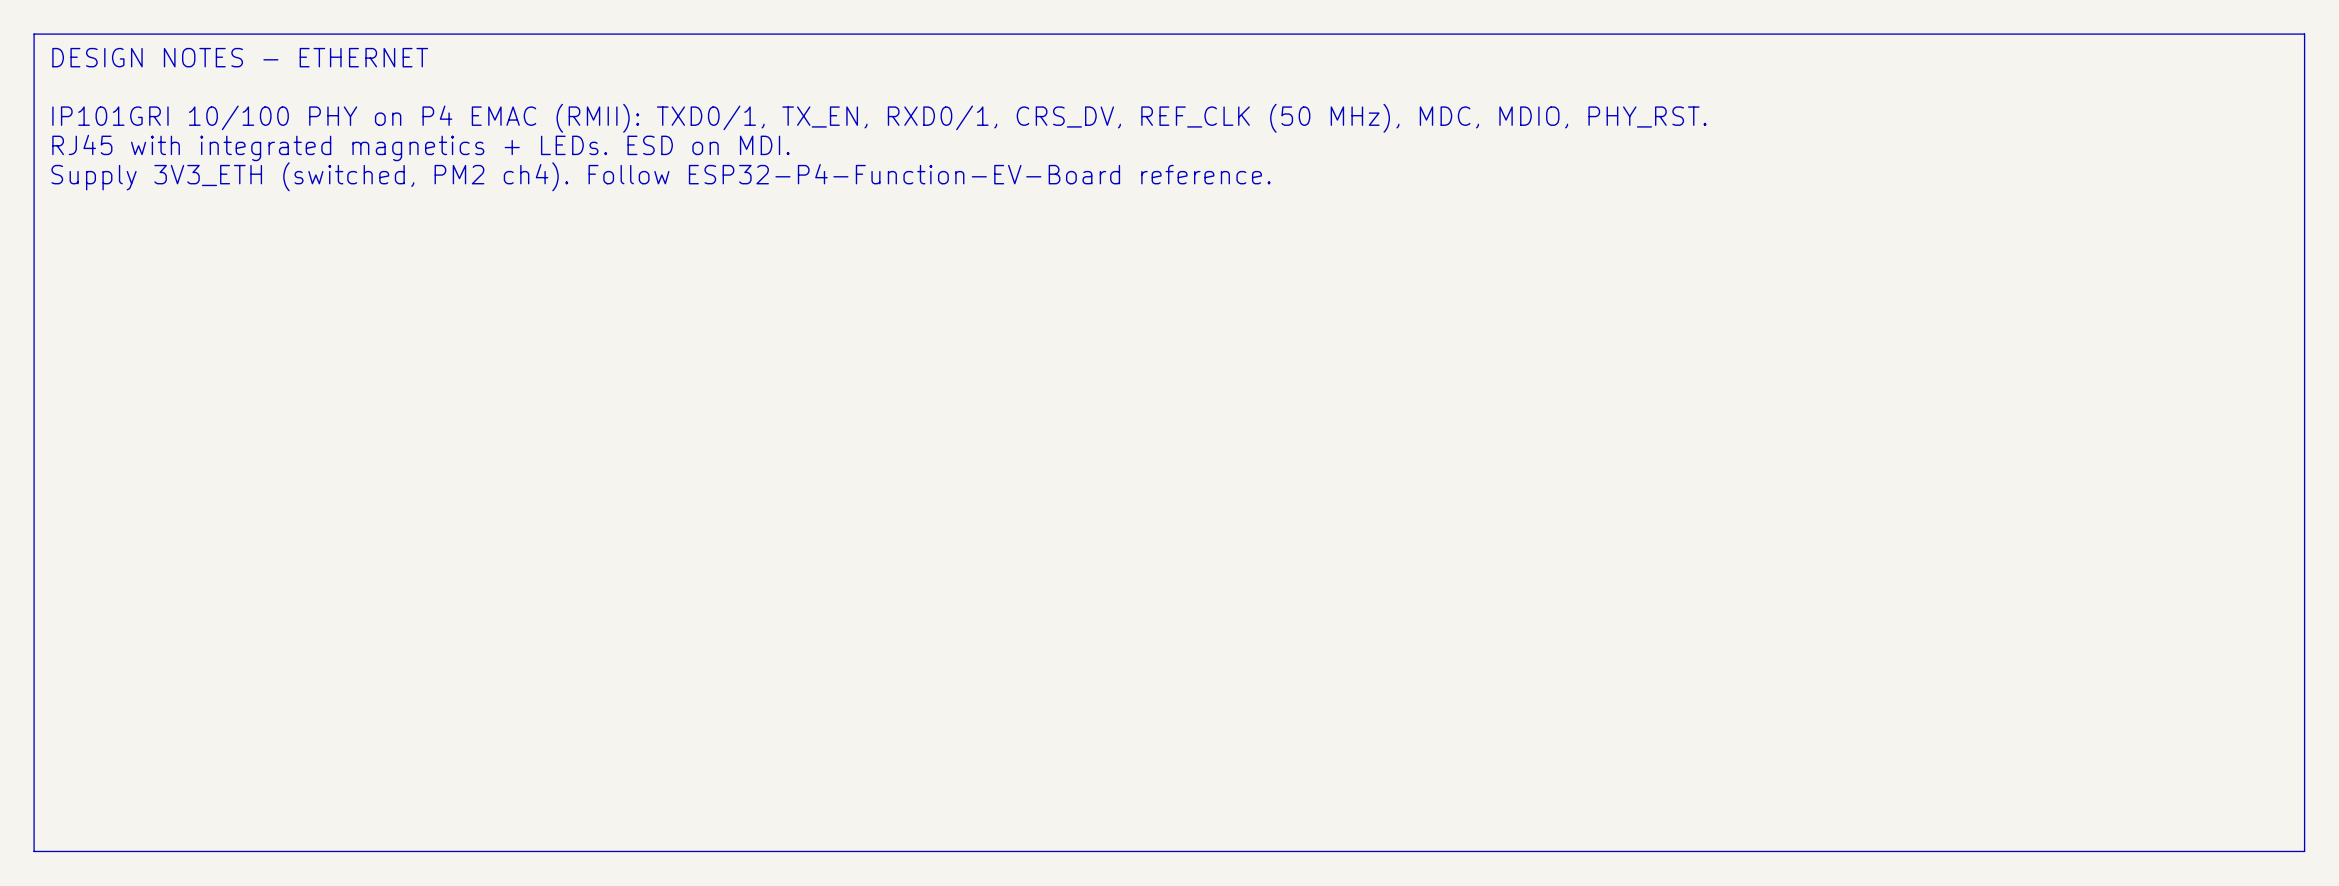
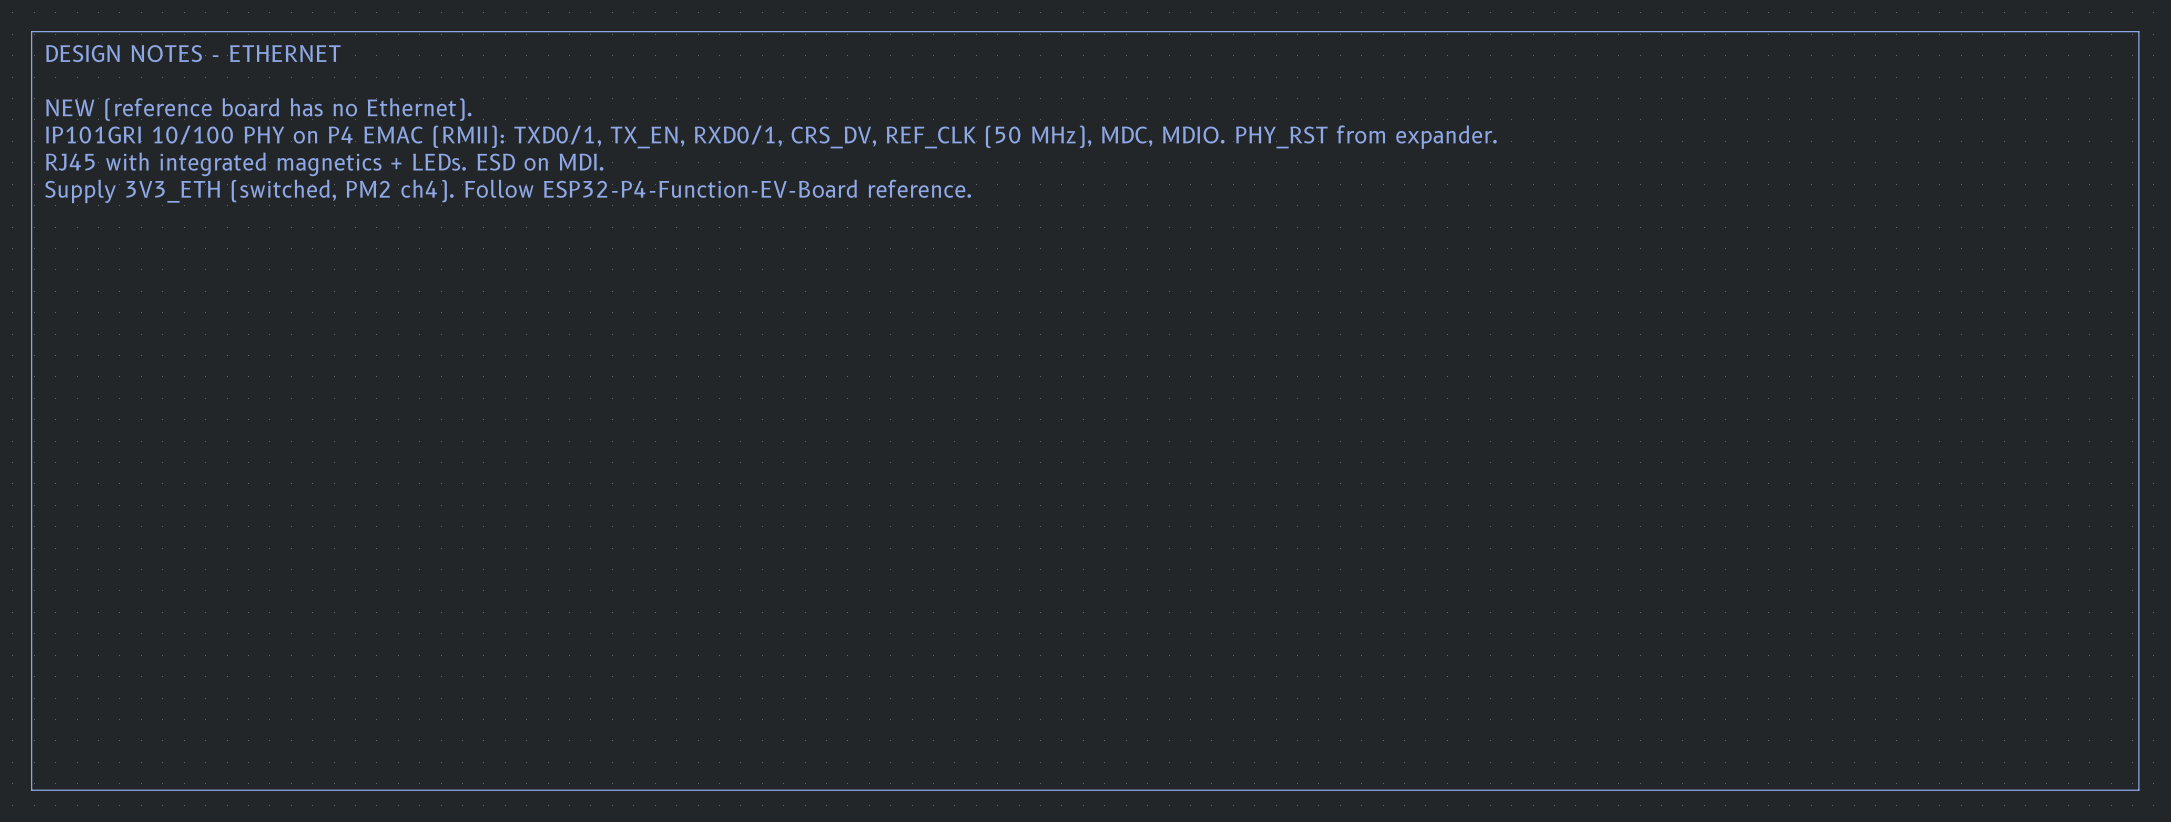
text: IP101GRI 10/100 PHY on P4 EMAC (RMII): TXD0/1, TX_EN, RXD0/1, CRS_DV, REF_CLK (50 MHz), MDC, MDIO, PHY_RST. (879, 118) -> NEW (reference board has no Ethernet). (258, 109)
text: RJ45 with integrated magnetics + LEDs. ESD on MDI. (420, 147) -> IP101GRI 10/100 PHY on P4 EMAC (RMII): TXD0/1, TX_EN, RXD0/1, CRS_DV, REF_CLK (50 MHz), MDC, MDIO. PHY_RST from expander. (771, 137)
text: Supply 3V3_ETH (switched, PM2 ch4). Follow ESP32-P4-Function-EV-Board reference. (661, 176) -> RJ45 with integrated magnetics + LEDs. ESD on MDI. (324, 164)
text: none -> Supply 3V3_ETH (switched, PM2 ch4). Follow ESP32-P4-Function-EV-Board reference. (508, 191)

